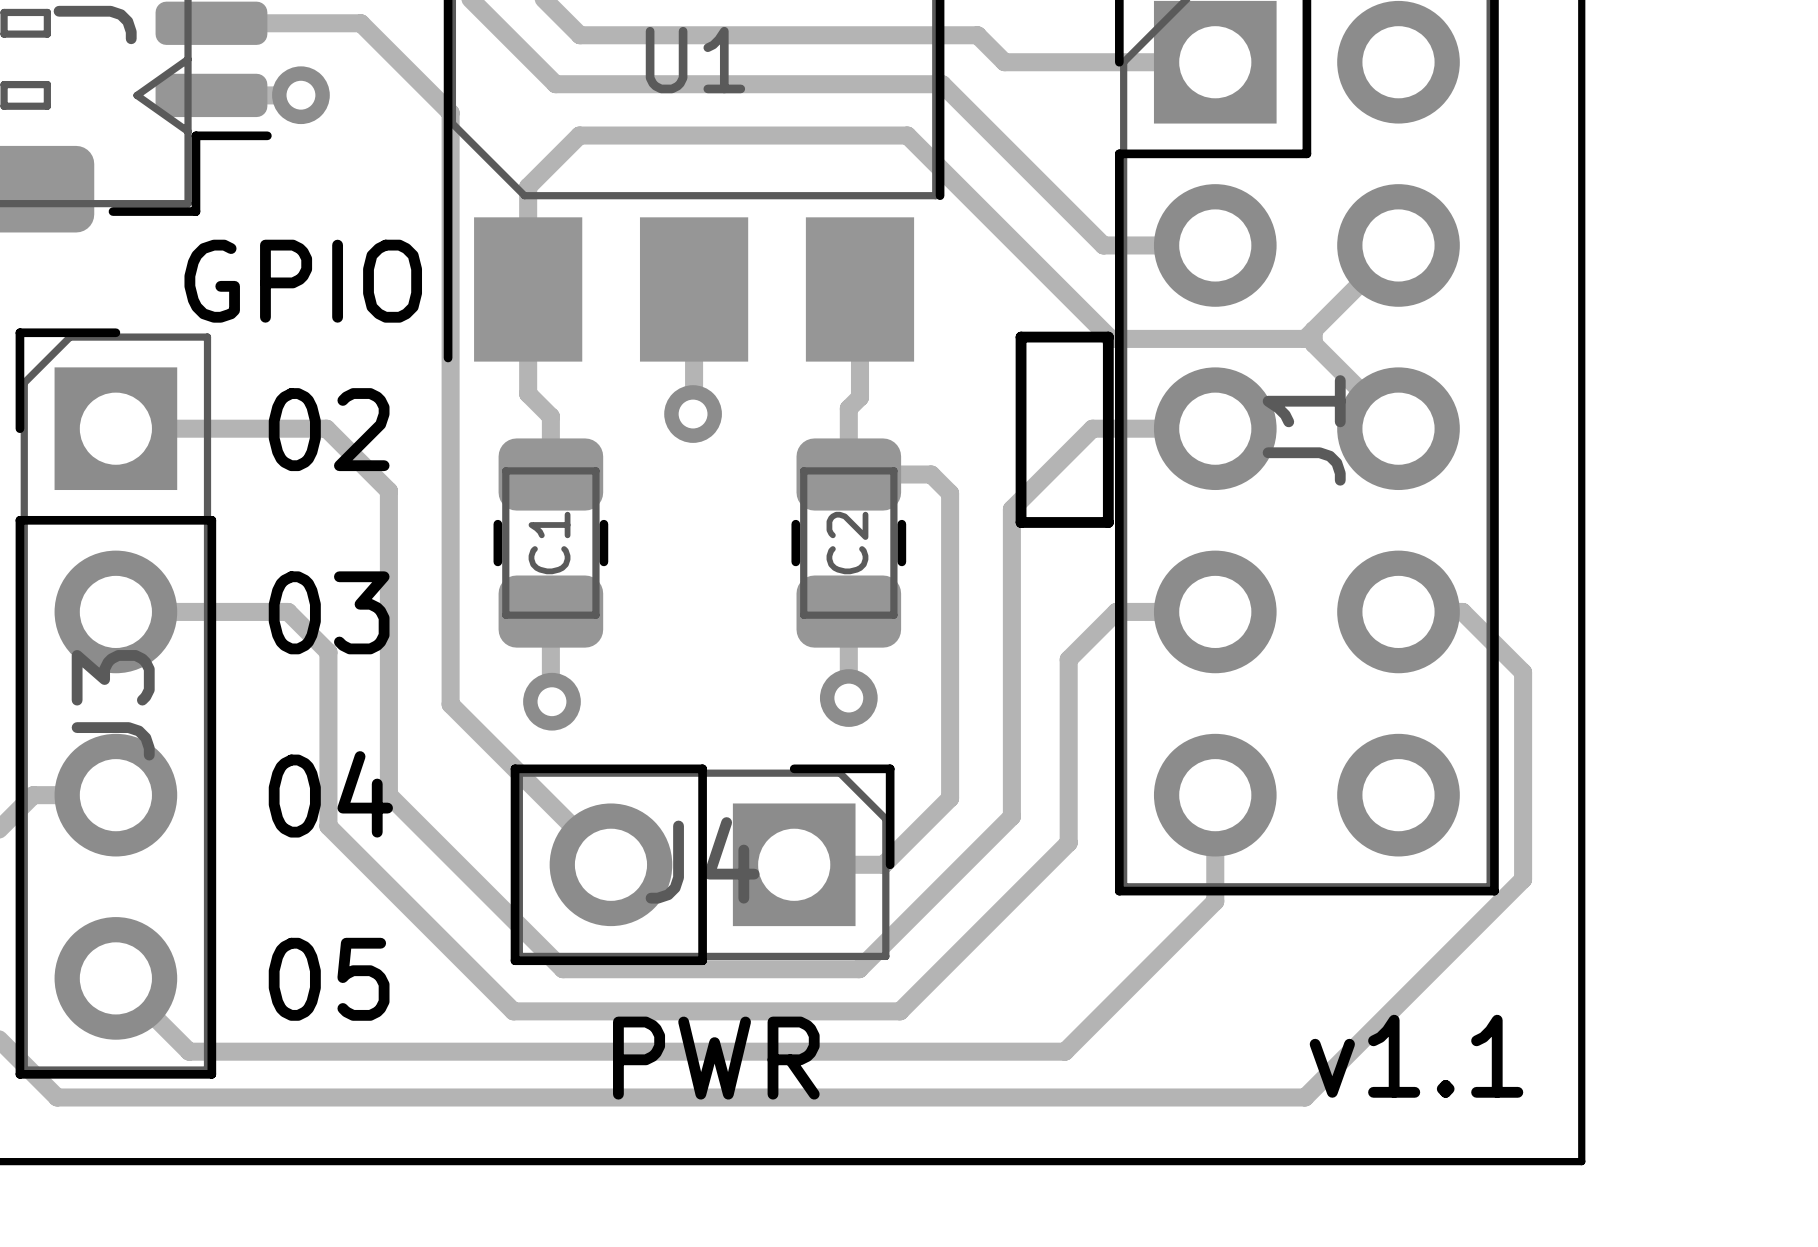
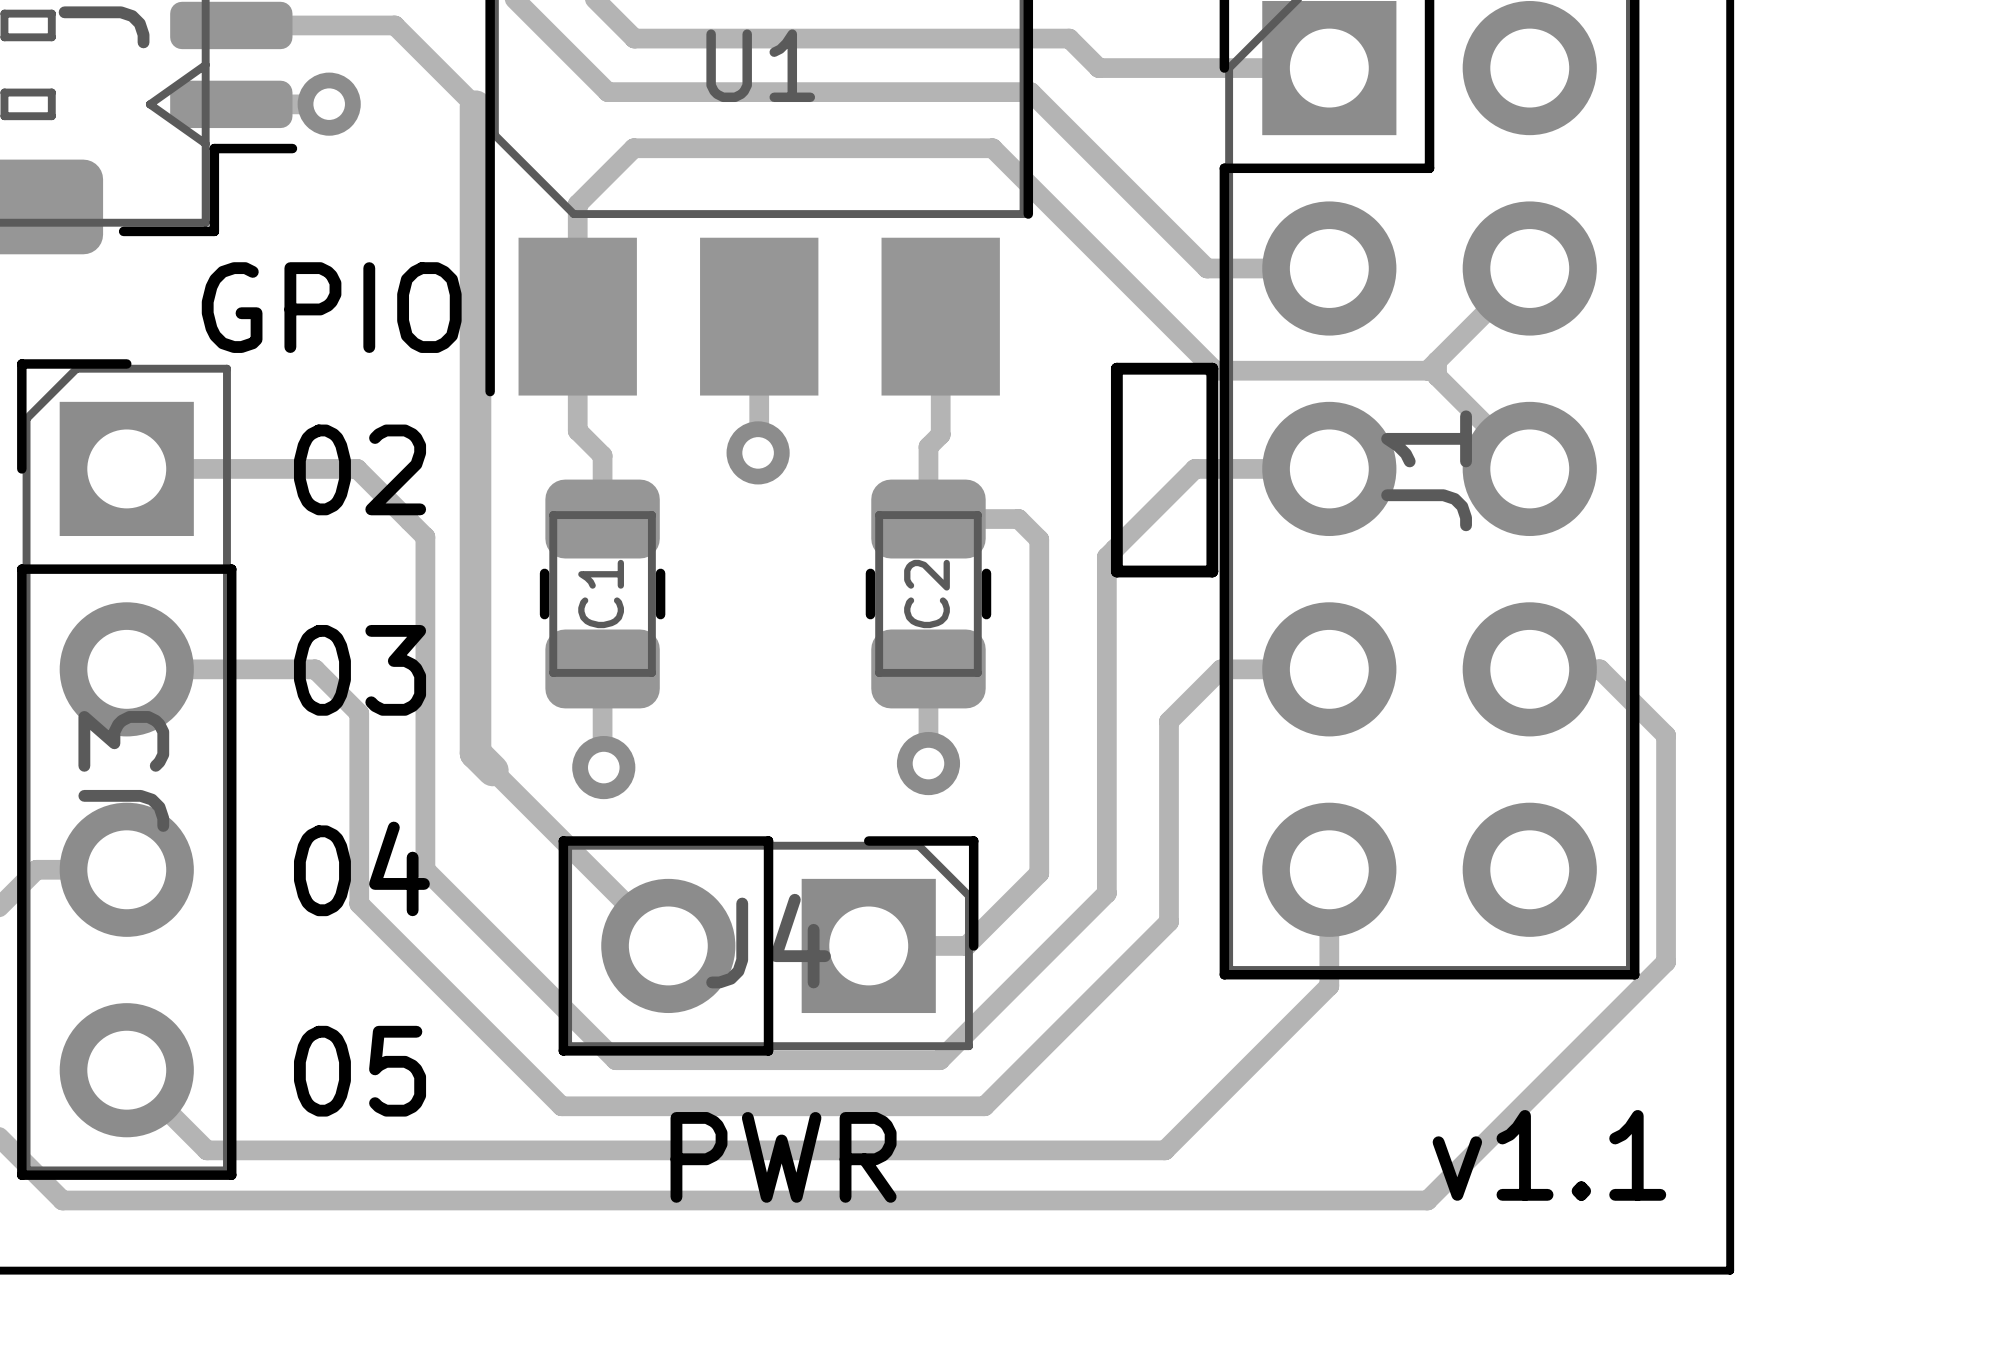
track: (434, 97) (450, 112) (450, 704) -> (475, 106) (475, 753) (492, 770)

